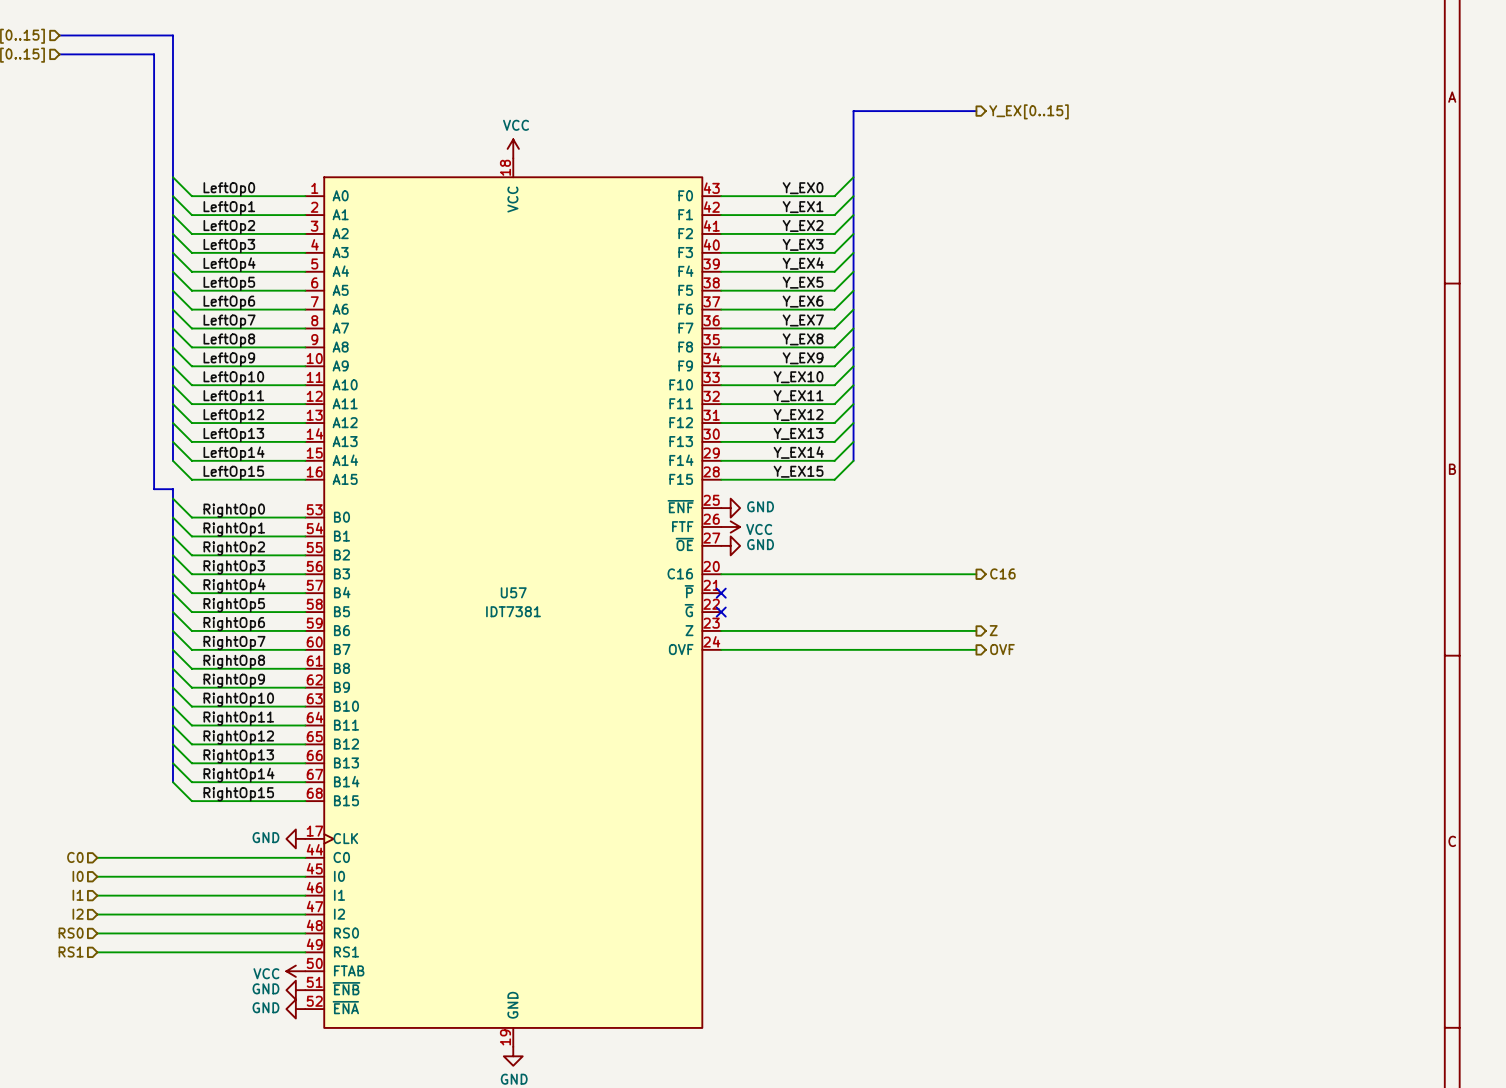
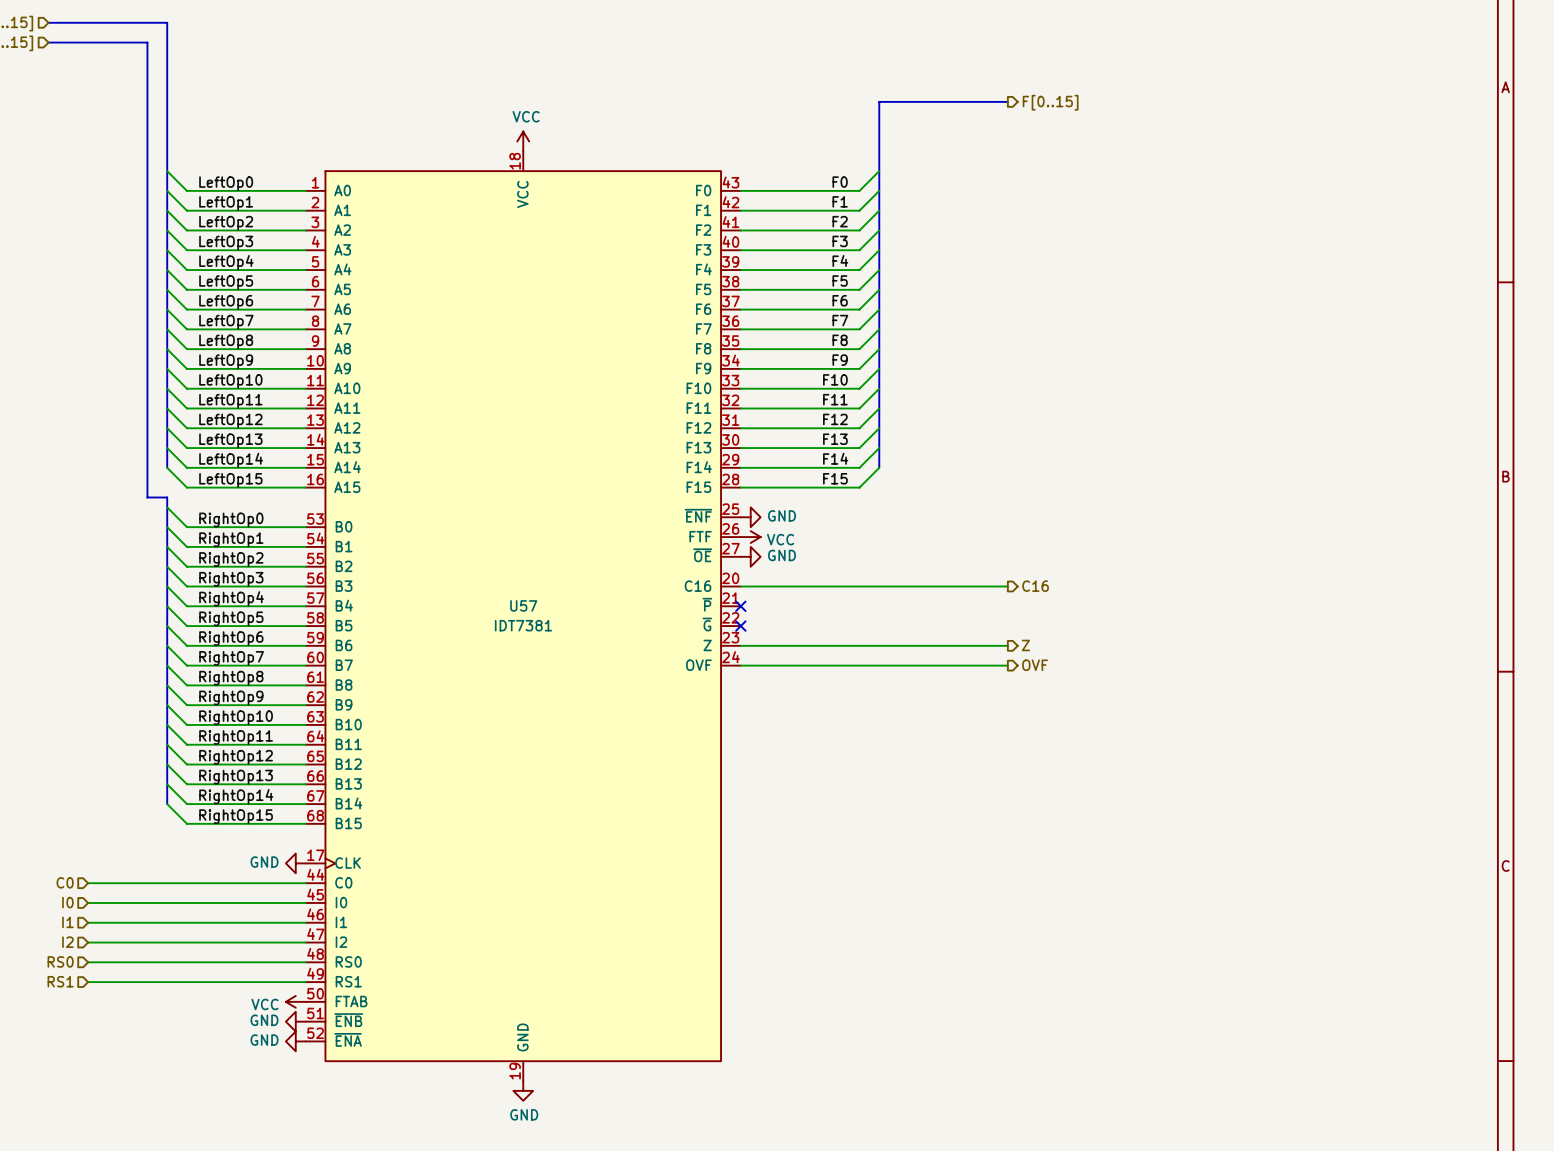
hierarchical label: Y_EX[0..15] (1029, 111) -> F[0..15] (1050, 102)
label: Y_EX0 (803, 188) -> F0 (840, 182)
label: Y_EX1 (803, 207) -> F1 (840, 201)
label: Y_EX2 (803, 225) -> F2 (840, 221)
label: Y_EX3 (803, 244) -> F3 (840, 241)
label: Y_EX4 (803, 263) -> F4 (840, 260)
label: Y_EX5 (803, 282) -> F5 (840, 280)
label: Y_EX6 (803, 301) -> F6 (840, 300)
label: Y_EX7 (803, 320) -> F7 (840, 320)
label: Y_EX8 (803, 339) -> F8 (840, 340)
label: Y_EX9 (803, 358) -> F9 (840, 360)
label: Y_EX10 (798, 377) -> F10 (835, 379)
label: Y_EX11 (798, 396) -> F11 (835, 399)
label: Y_EX12 (798, 415) -> F12 (835, 419)
label: Y_EX13 (798, 433) -> F13 (835, 439)
label: Y_EX14 (798, 452) -> F14 (835, 458)
label: Y_EX15 (798, 471) -> F15 (835, 478)

